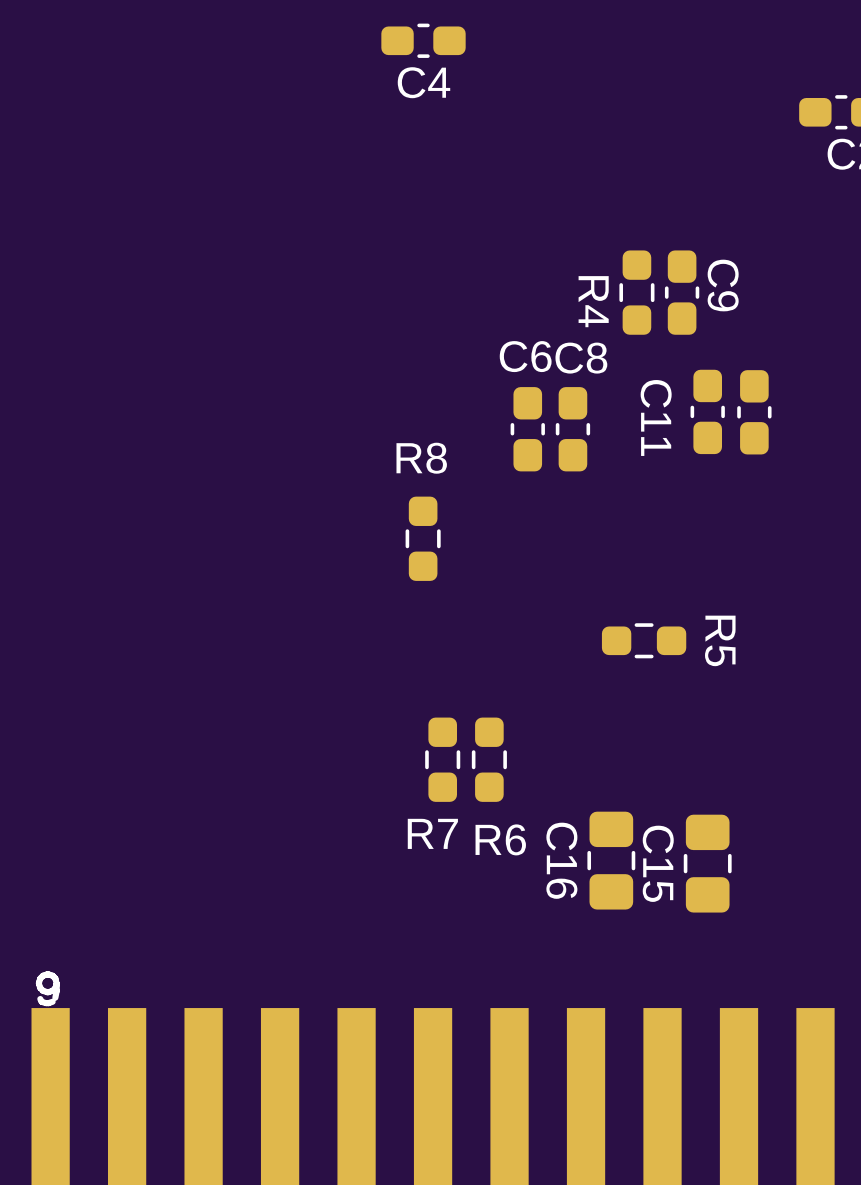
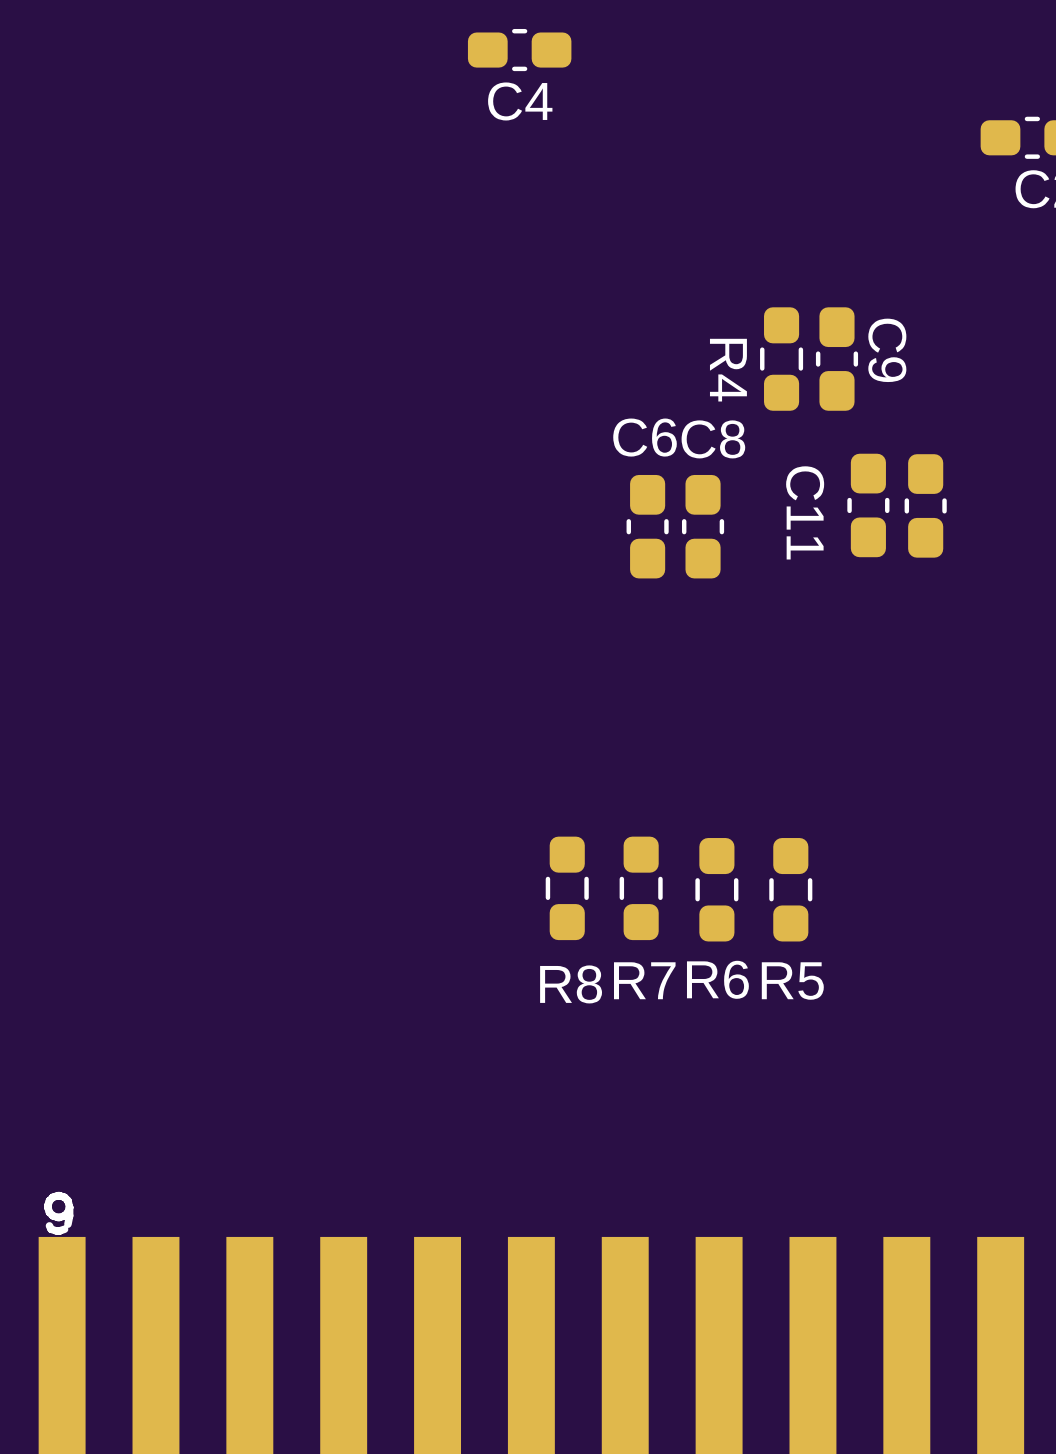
R8 name position: R8 (421, 458) -> R8 (571, 984)
R8 position: (423, 538) -> (567, 888)
R5 rotation: 0° (644, 640) -> 90° clockwise (790, 889)
R5 position: (644, 640) -> (790, 889)
R7 position: (442, 759) -> (641, 888)
R6 position: (489, 759) -> (716, 889)
R7 name position: R7 (432, 833) -> R7 (644, 980)
R6 name position: R6 (500, 839) -> R6 (717, 979)
C16: (611, 860) -> none
C15: (707, 863) -> none

